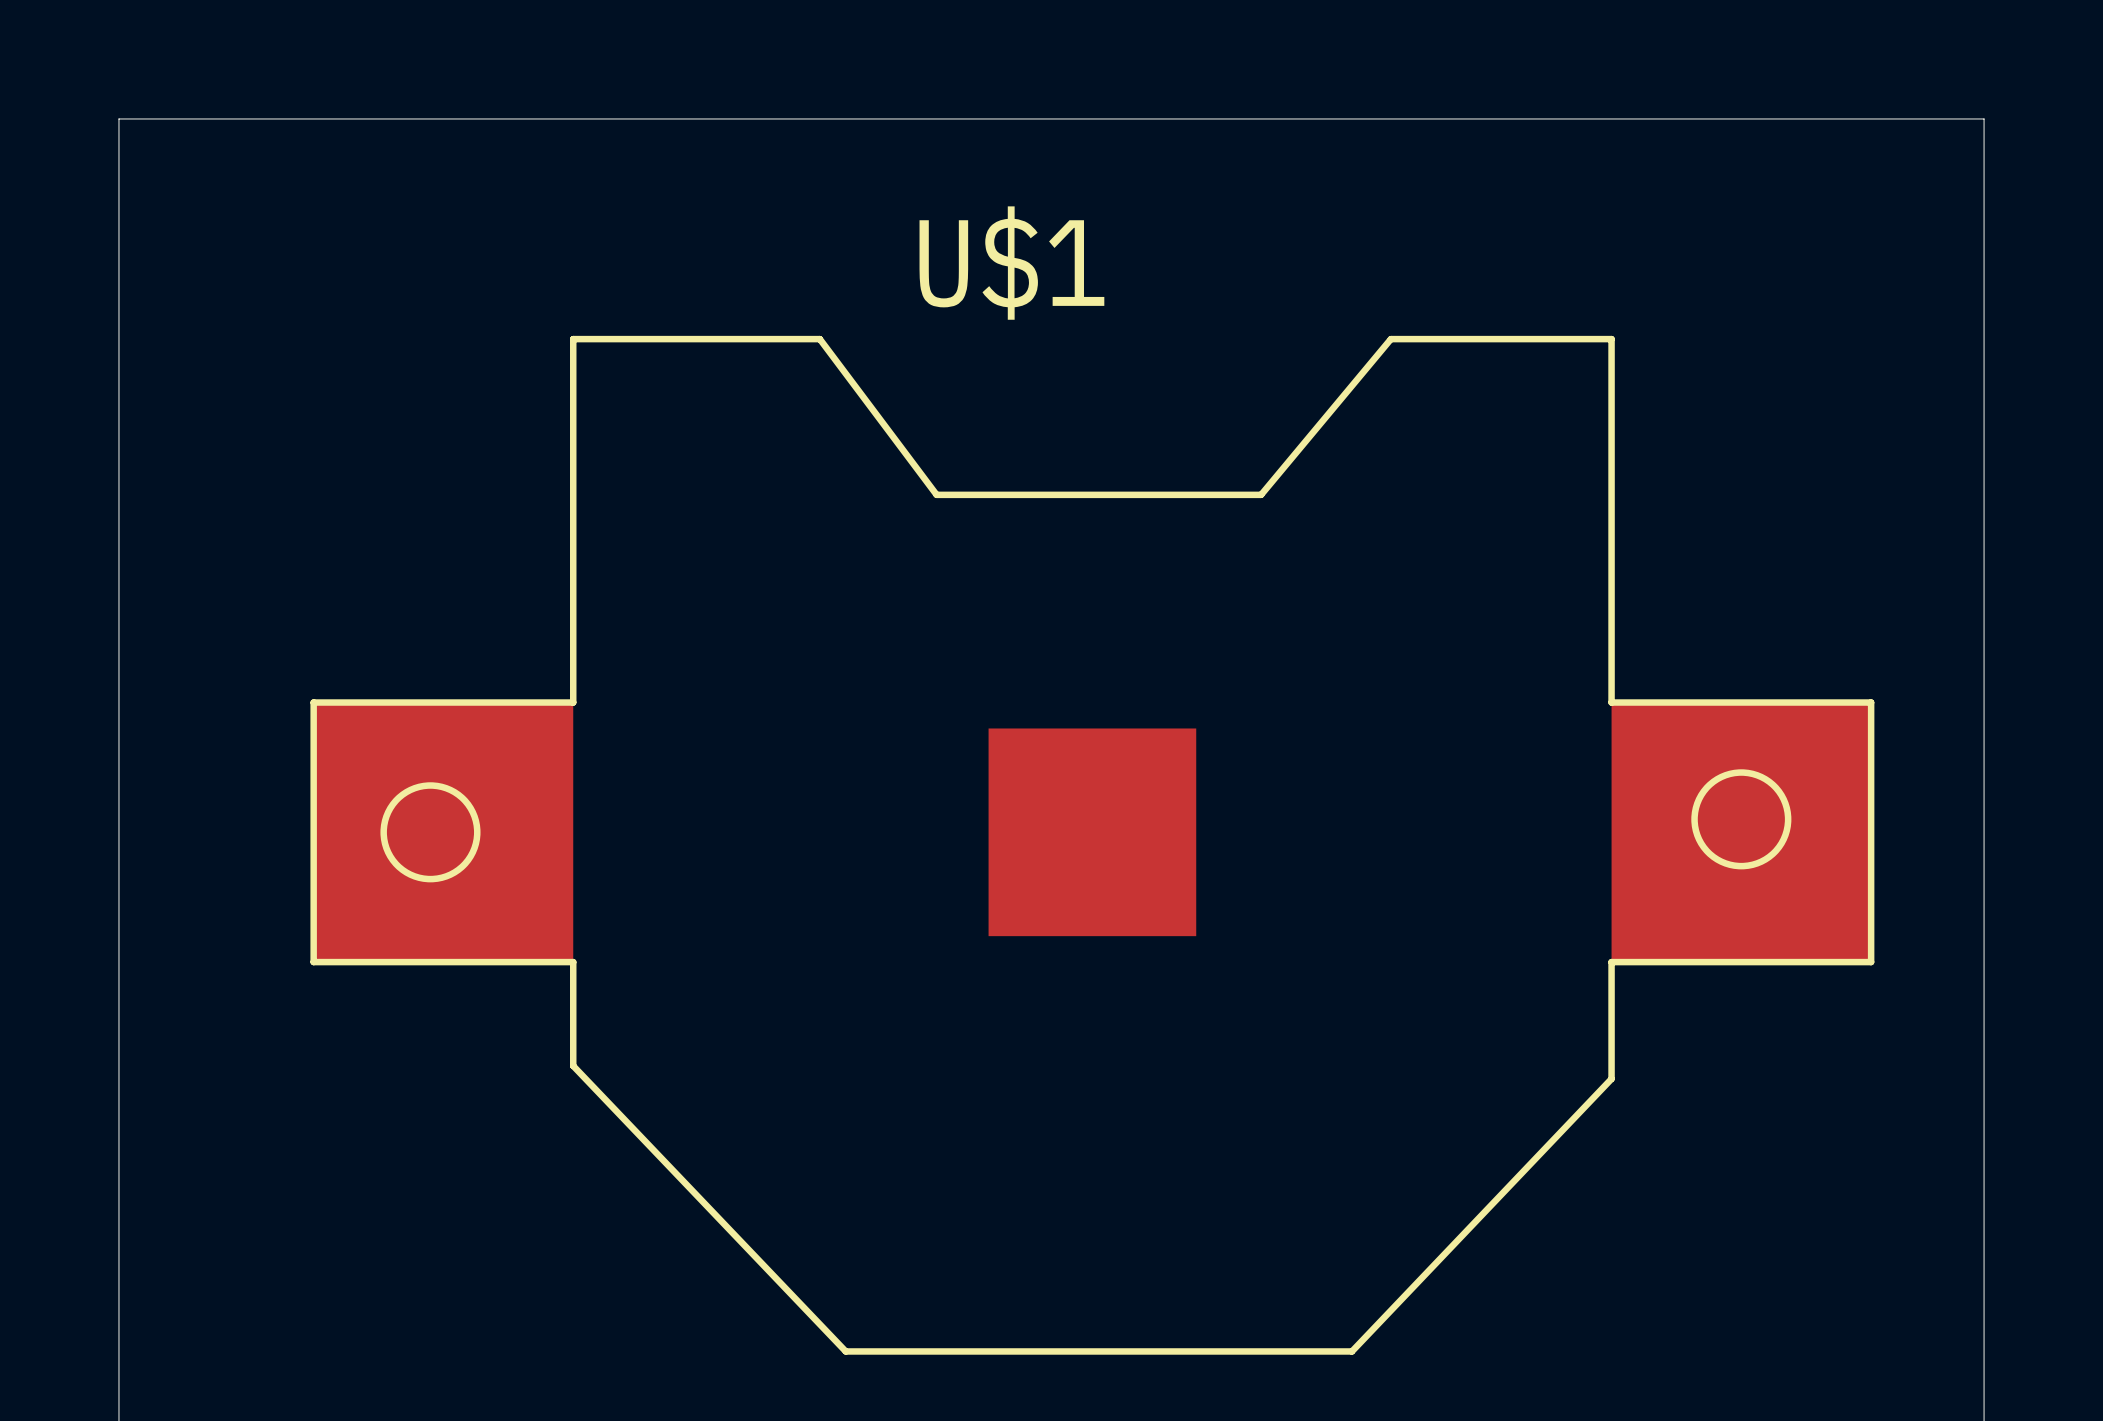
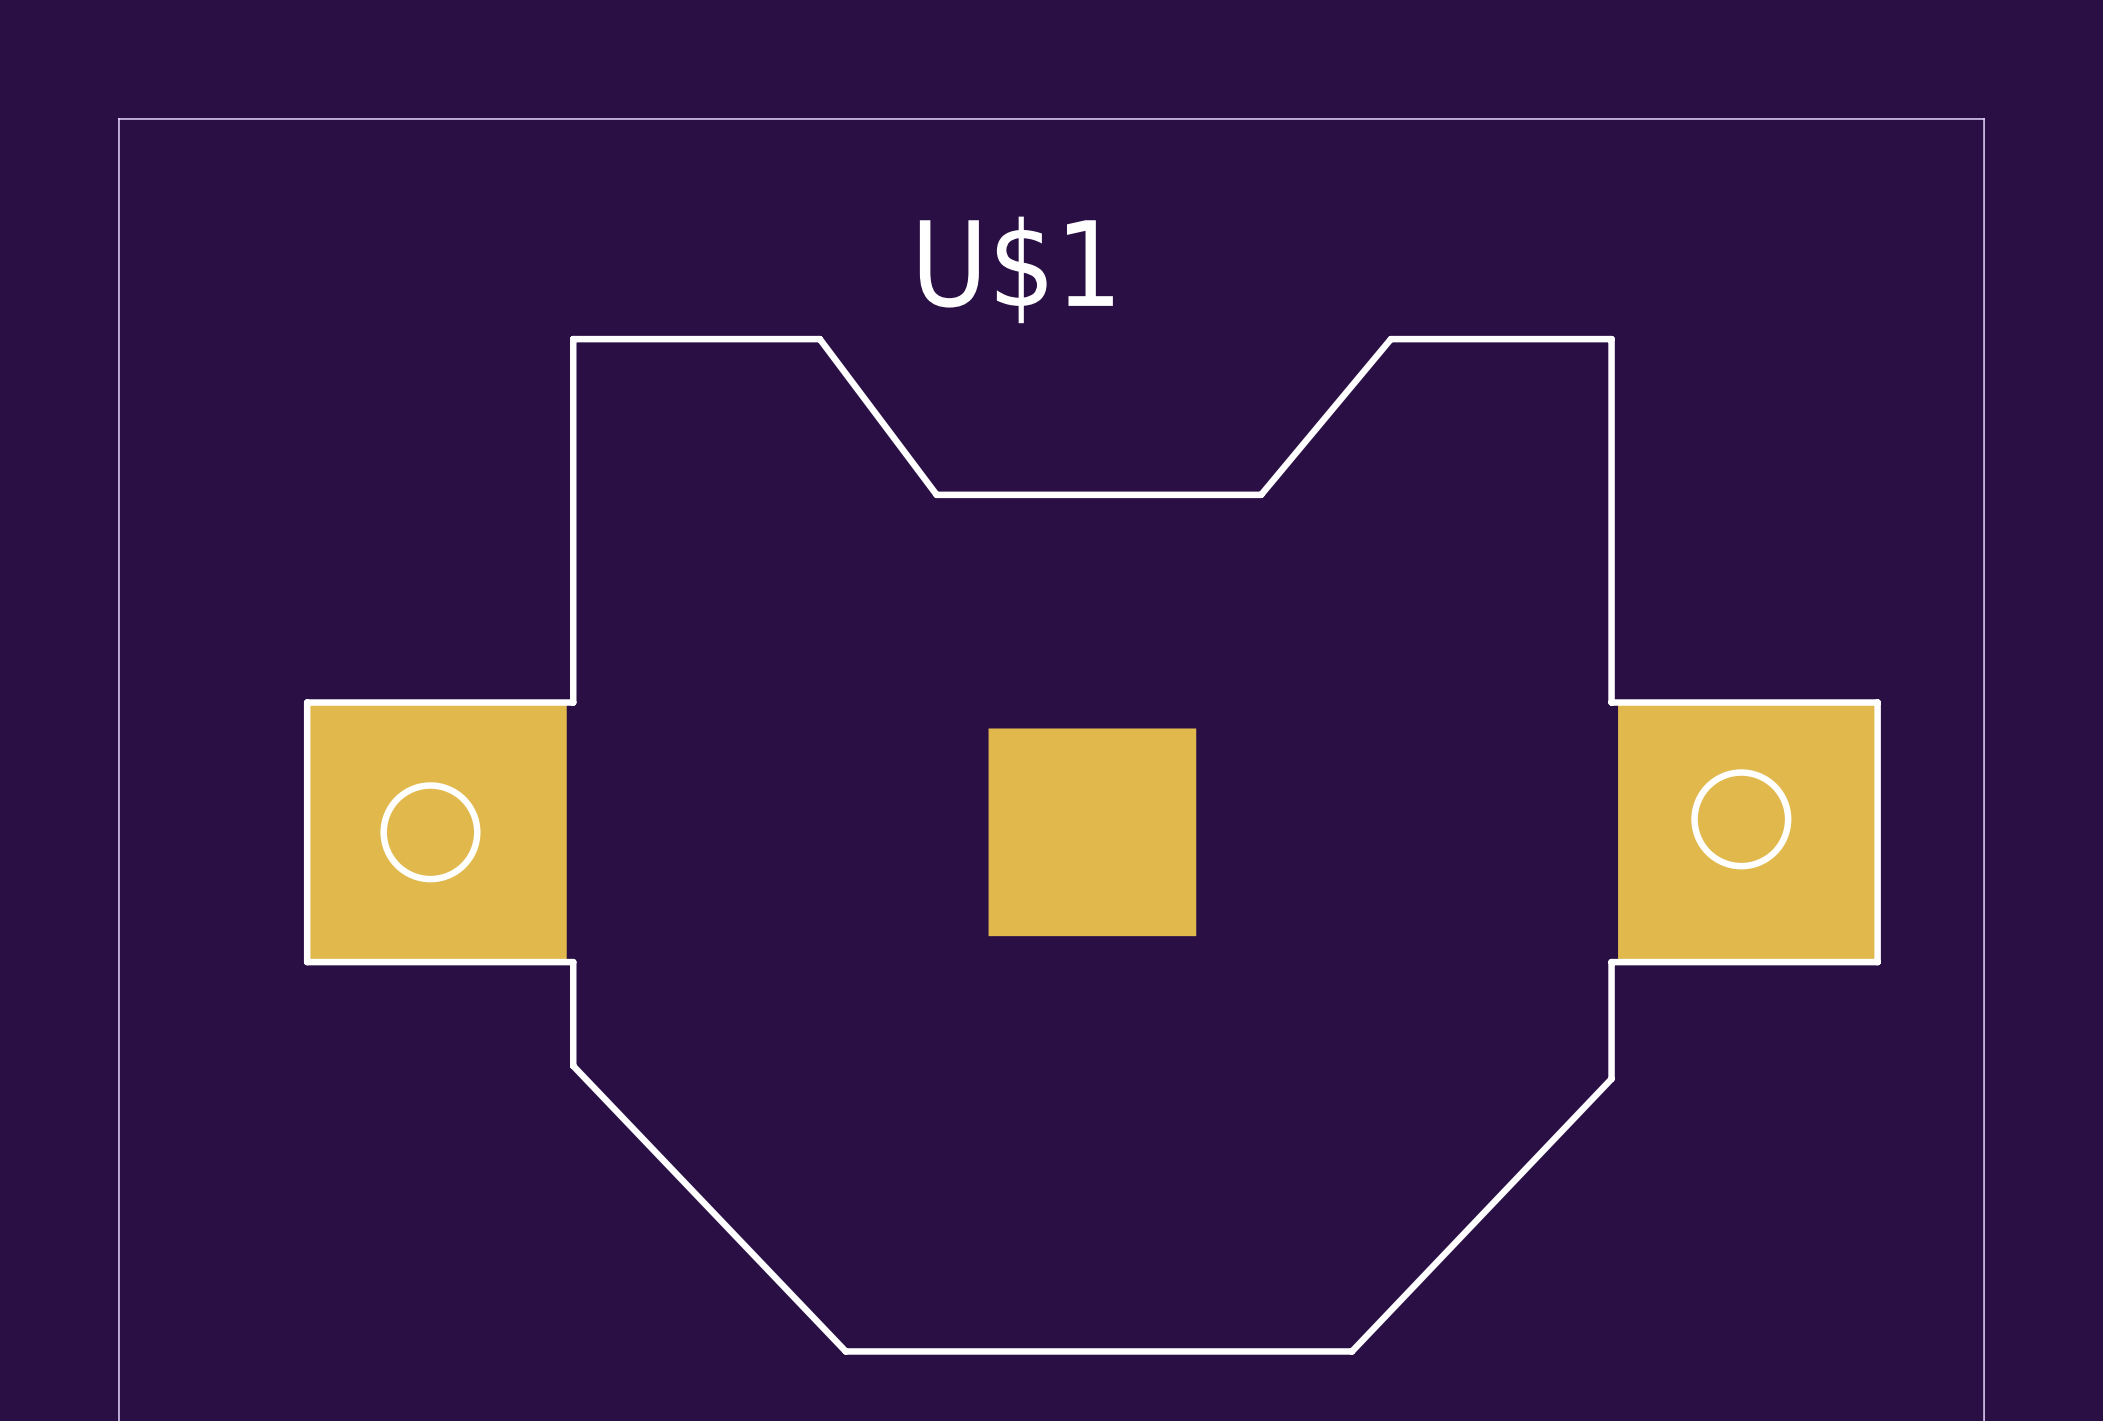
U$1 footprint: [310, 335, 1875, 1355] -> [303, 335, 1881, 1355]

